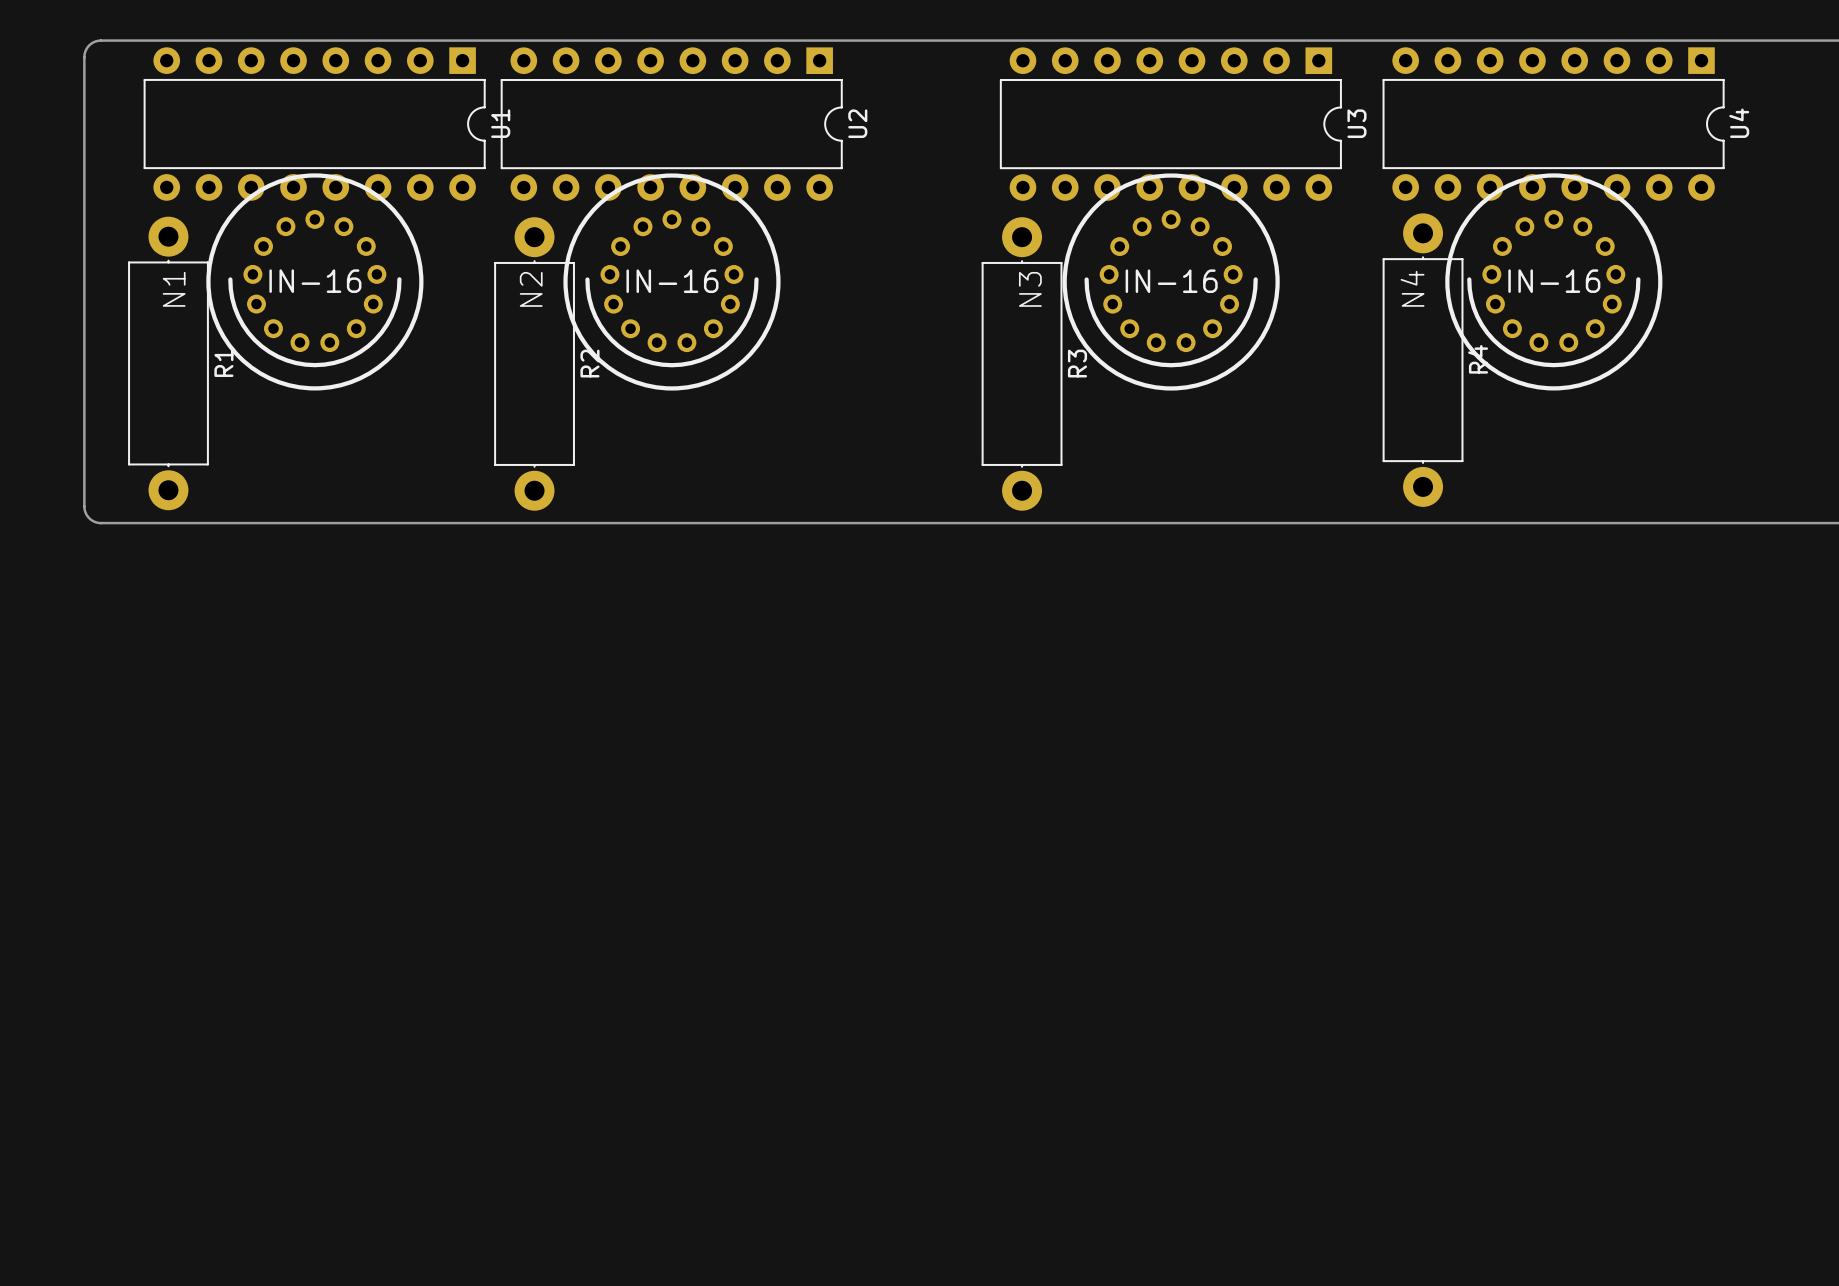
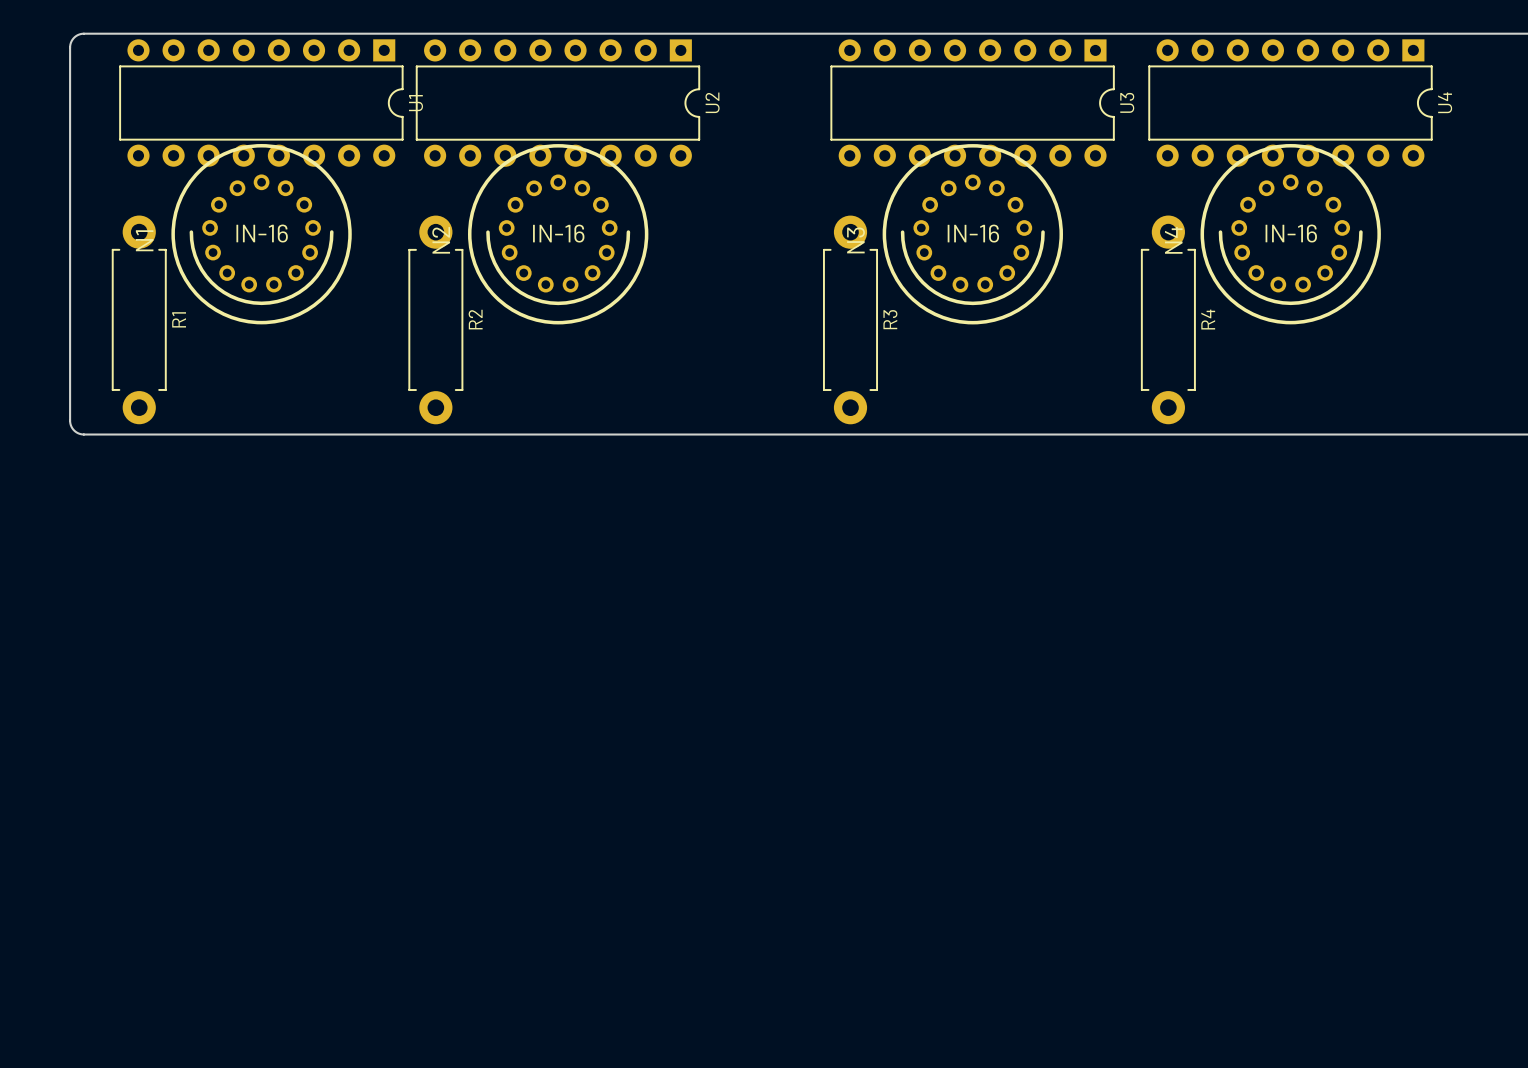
R4 footprint: [1382, 213, 1464, 507] -> [1141, 215, 1196, 425]
R1 footprint: [128, 216, 209, 511] -> [111, 215, 167, 425]
R2 footprint: [494, 217, 575, 511] -> [408, 215, 464, 425]
R3 footprint: [981, 217, 1063, 511] -> [823, 215, 878, 425]

